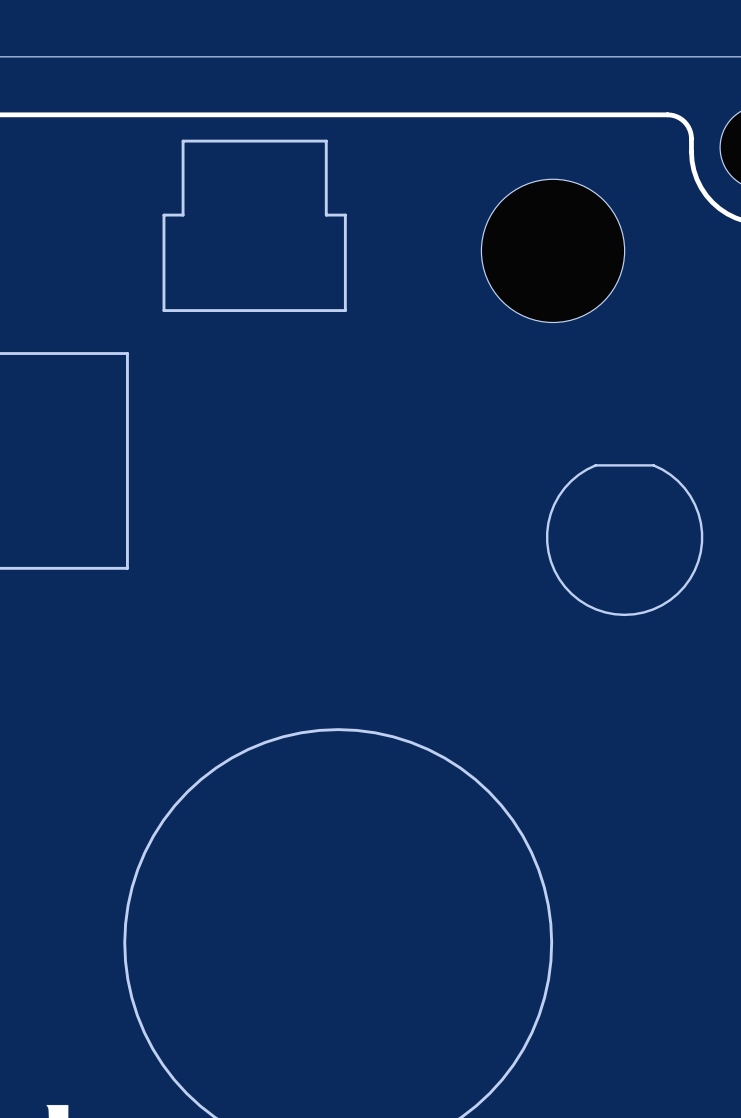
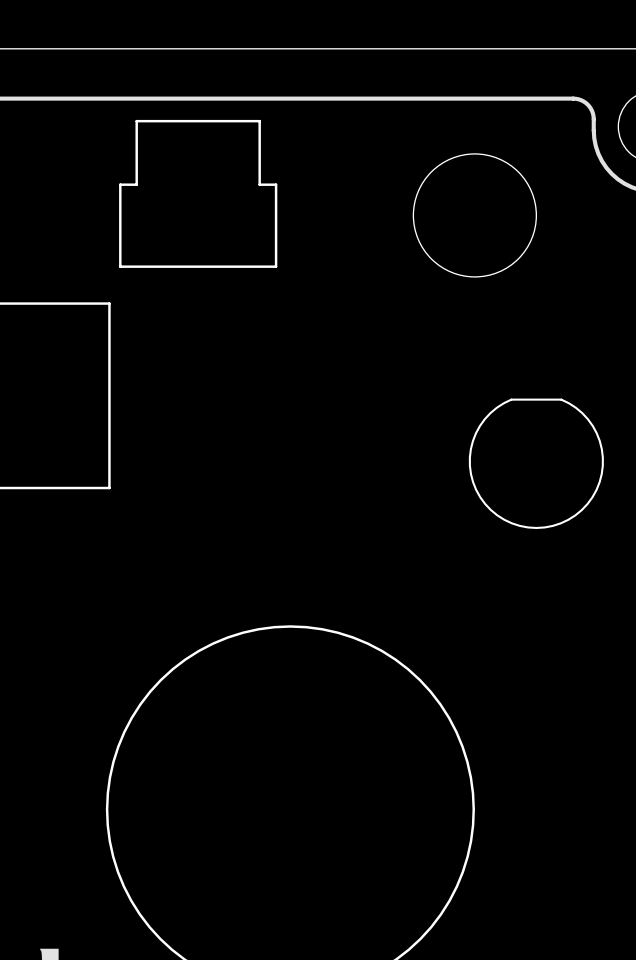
drawing position: (254, 225) -> (198, 193)

